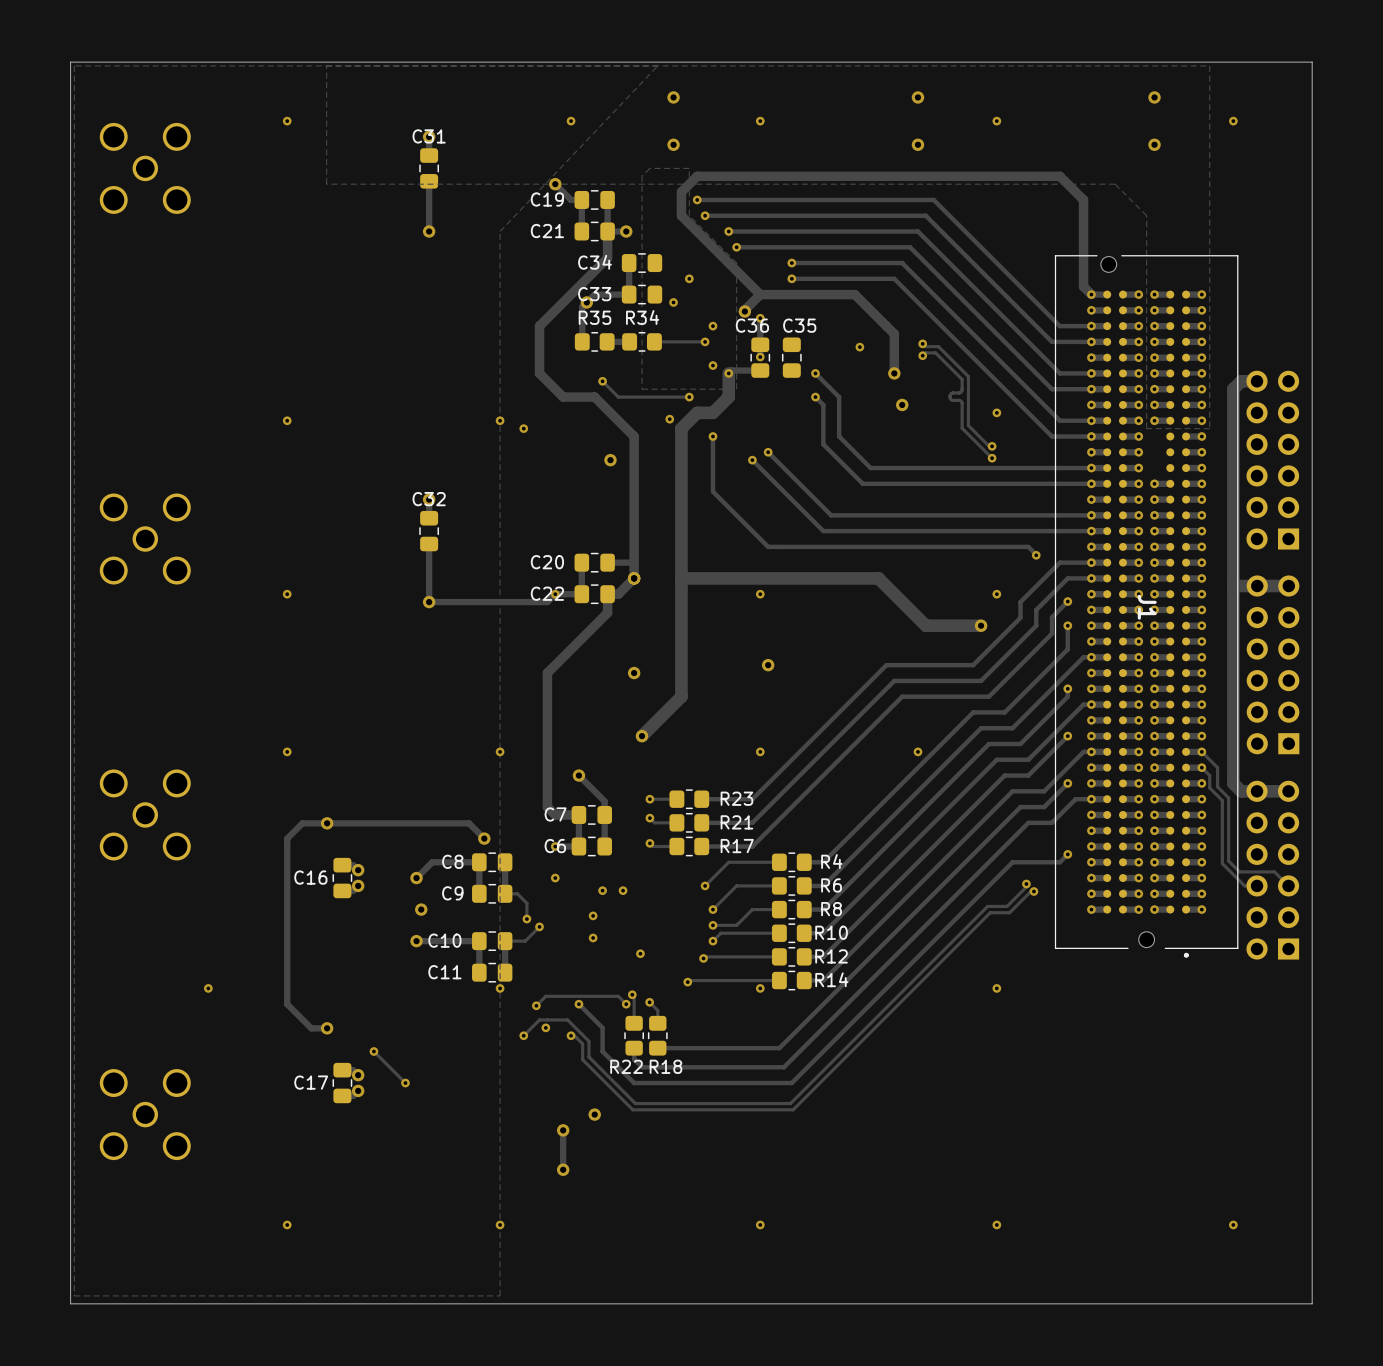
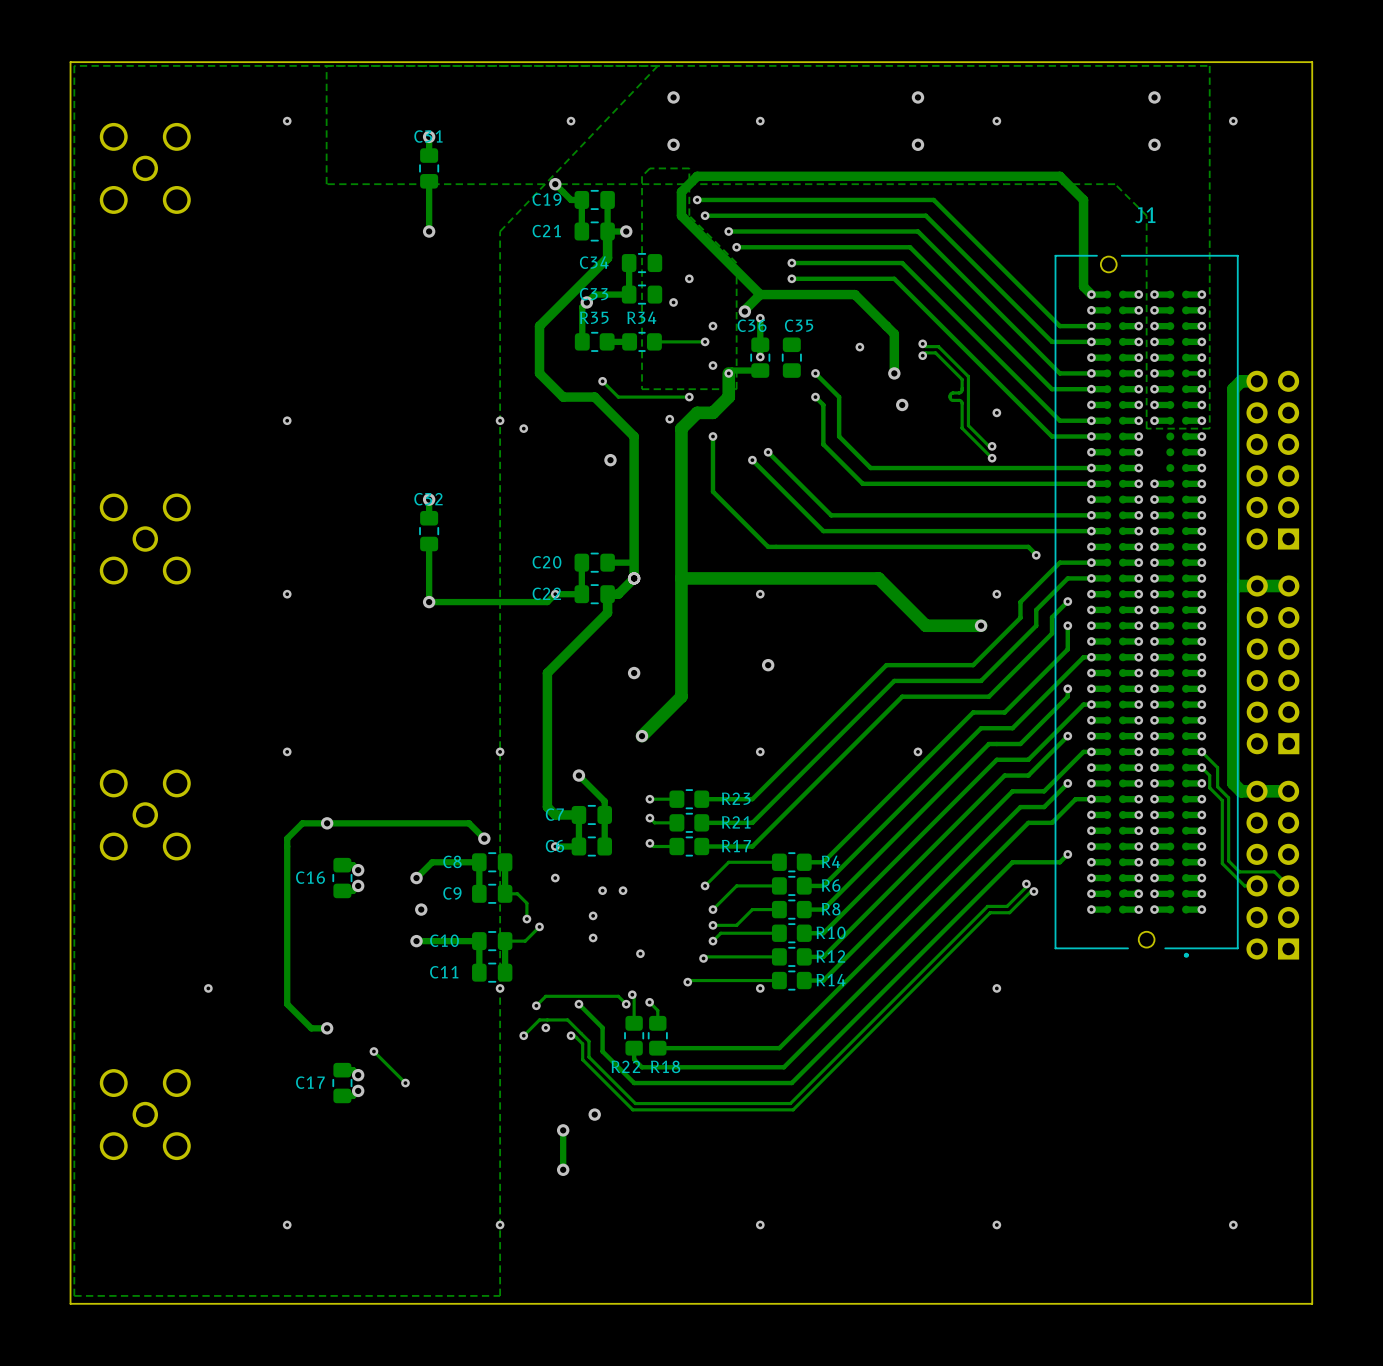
J1 name rotation: 0° (1147, 607) -> 90° counterclockwise (1145, 215)
J1 name position: J1 (1147, 607) -> J1 (1145, 215)

